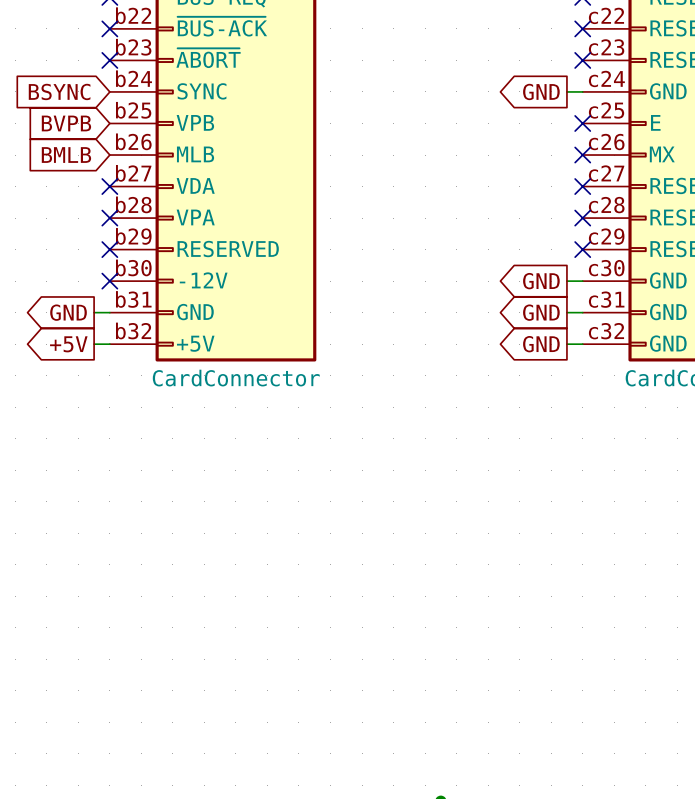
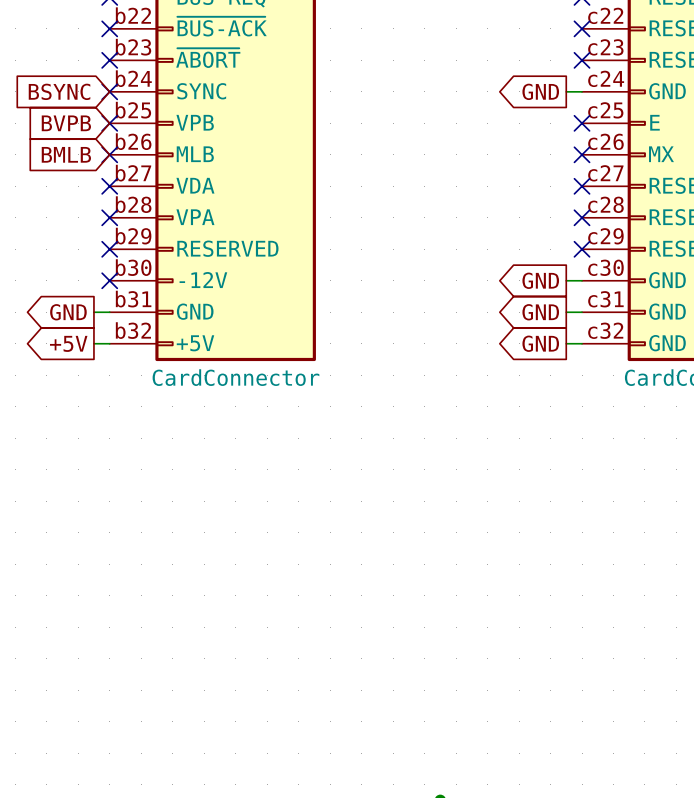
no-connect mark: none -> (109, 91)
no-connect mark: none -> (109, 123)
no-connect mark: none -> (109, 154)

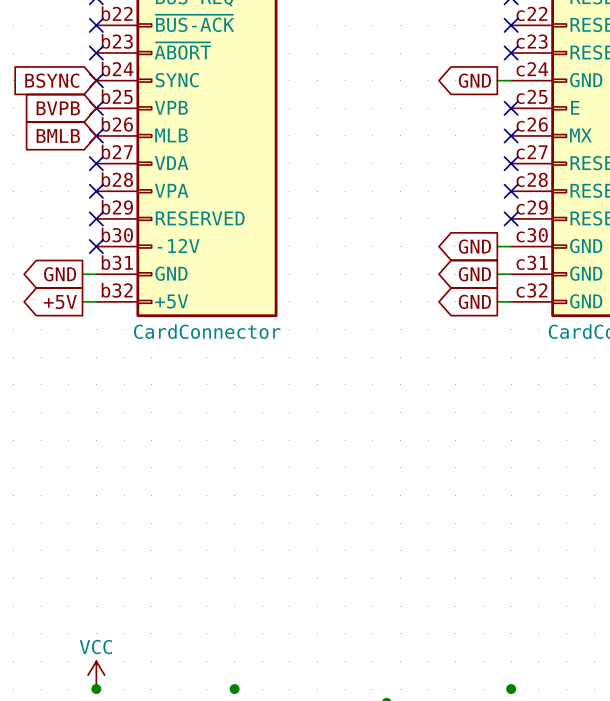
power symbol: none -> VCC (96, 675)
junction: none -> (96, 689)
junction: none -> (234, 689)
junction: none -> (511, 689)

